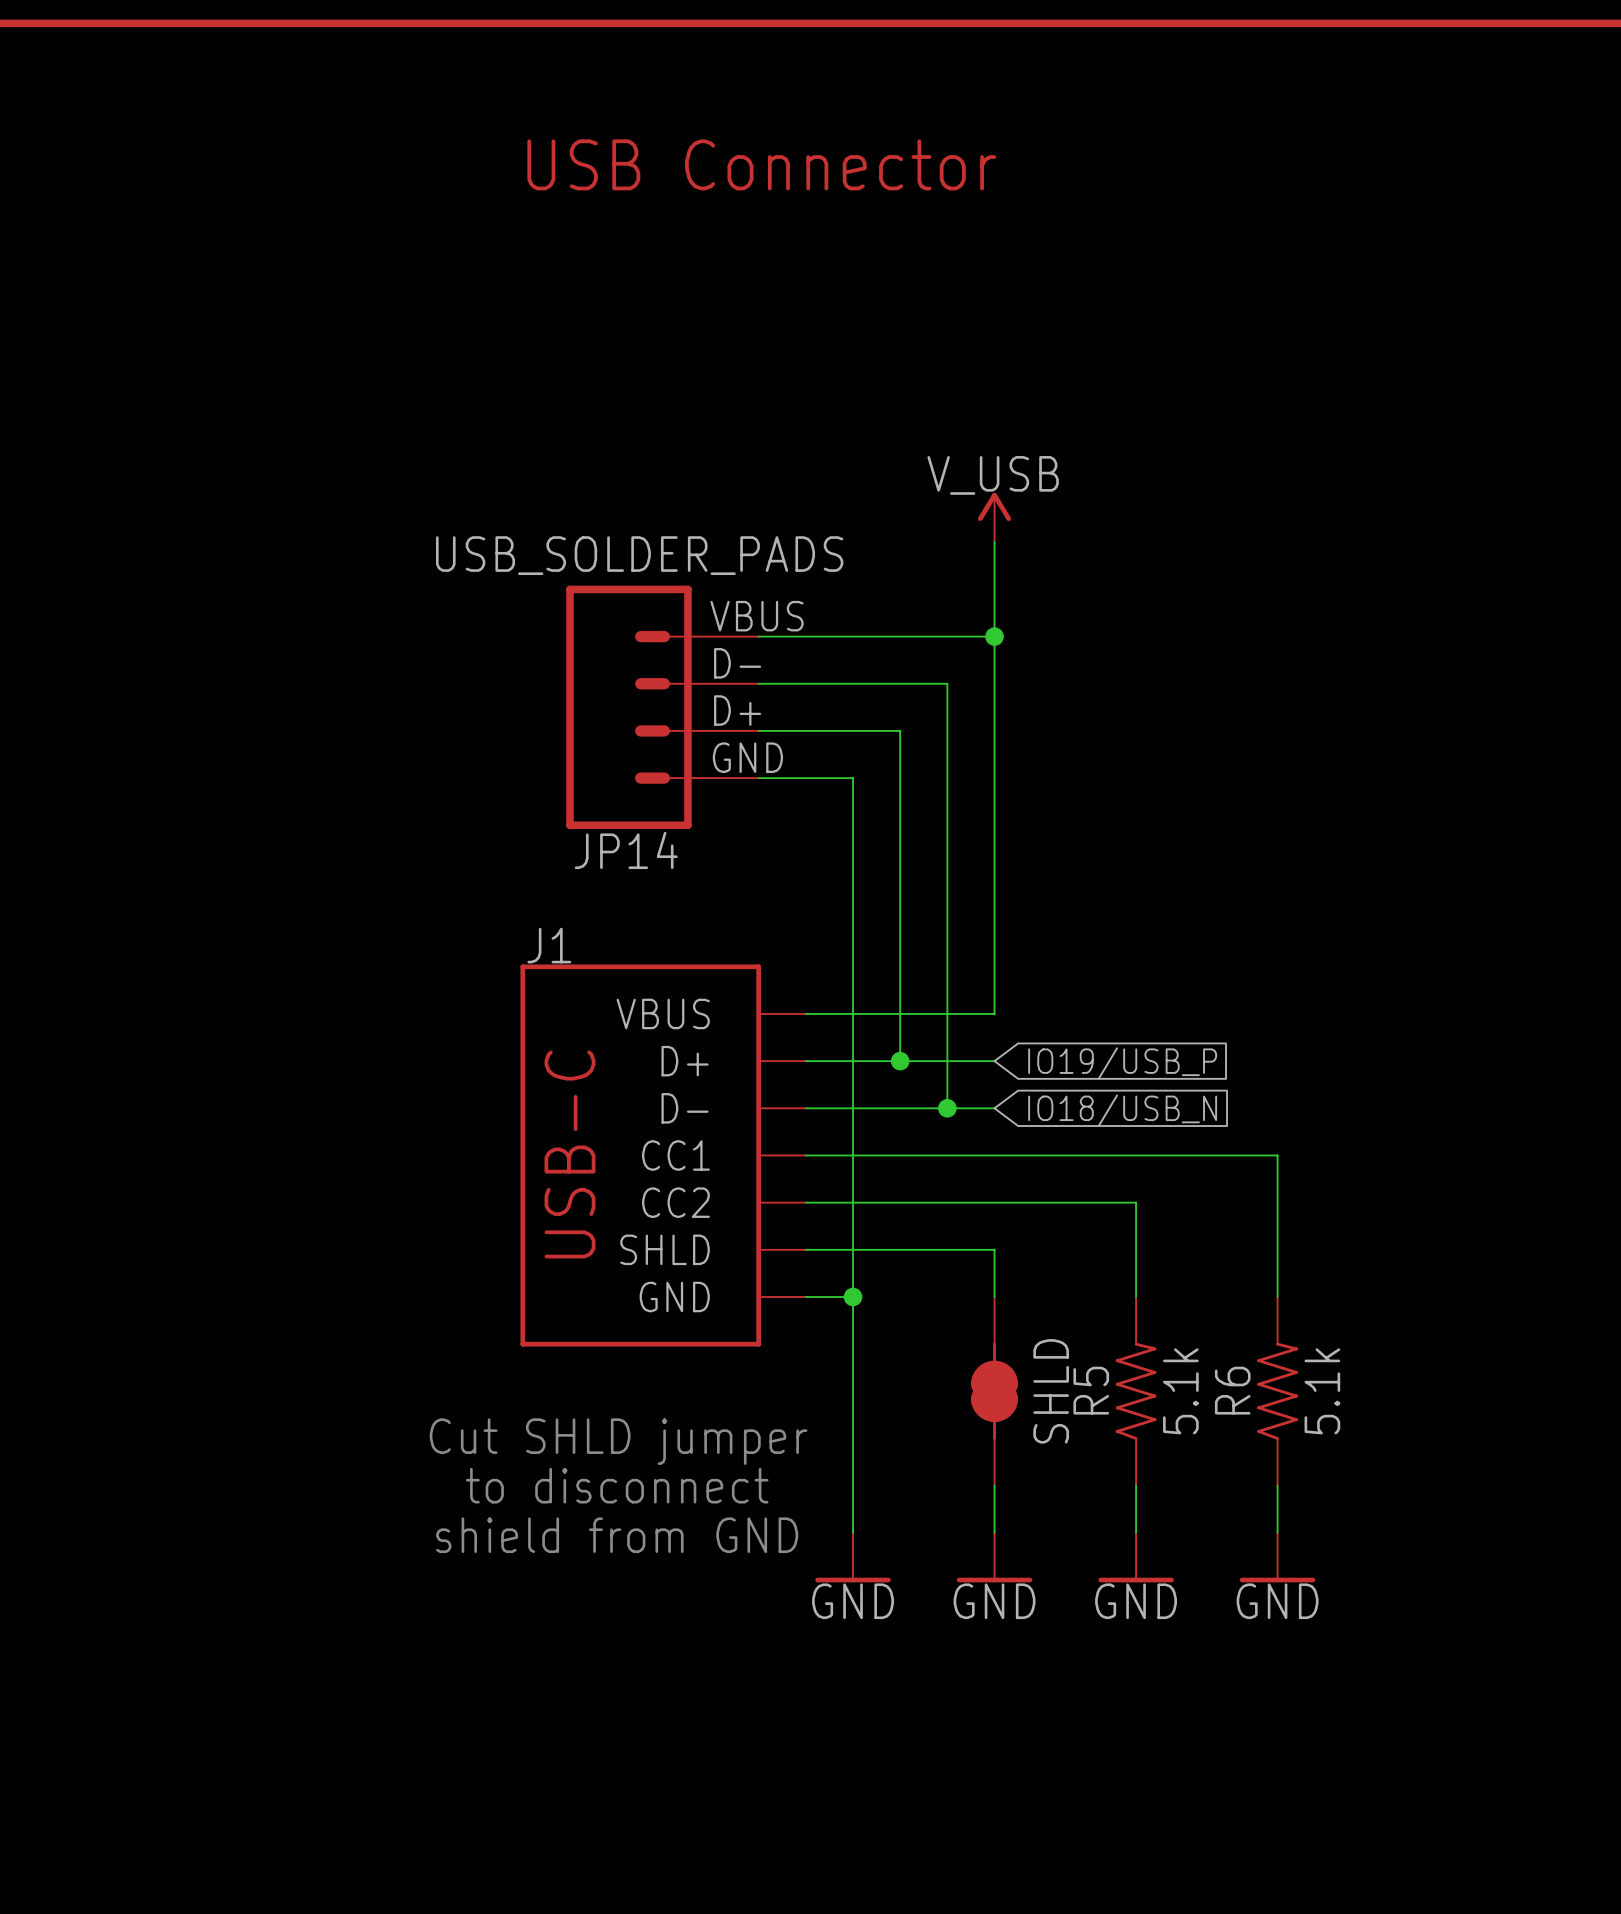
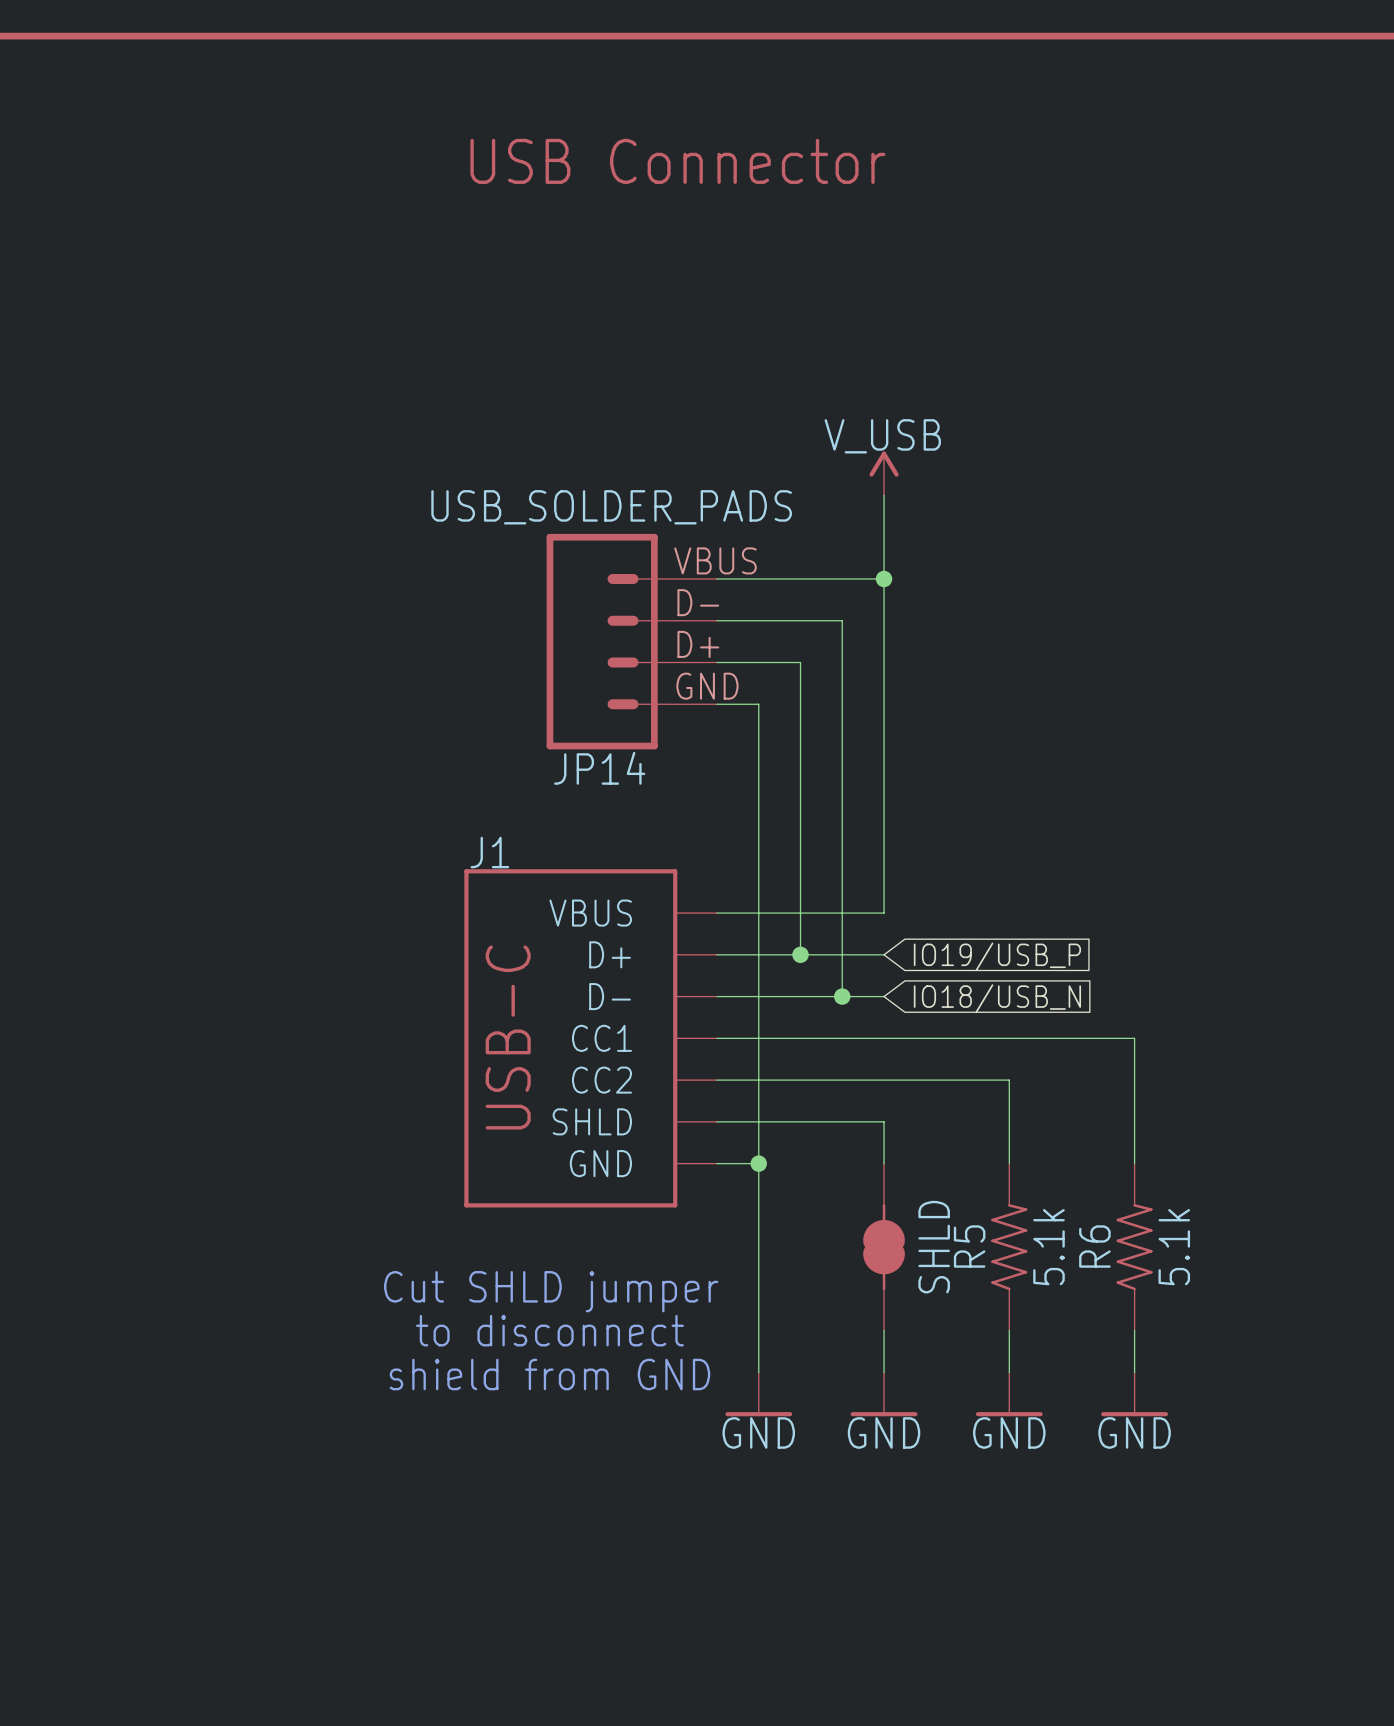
JP14 position: (662, 707) -> (631, 641)

